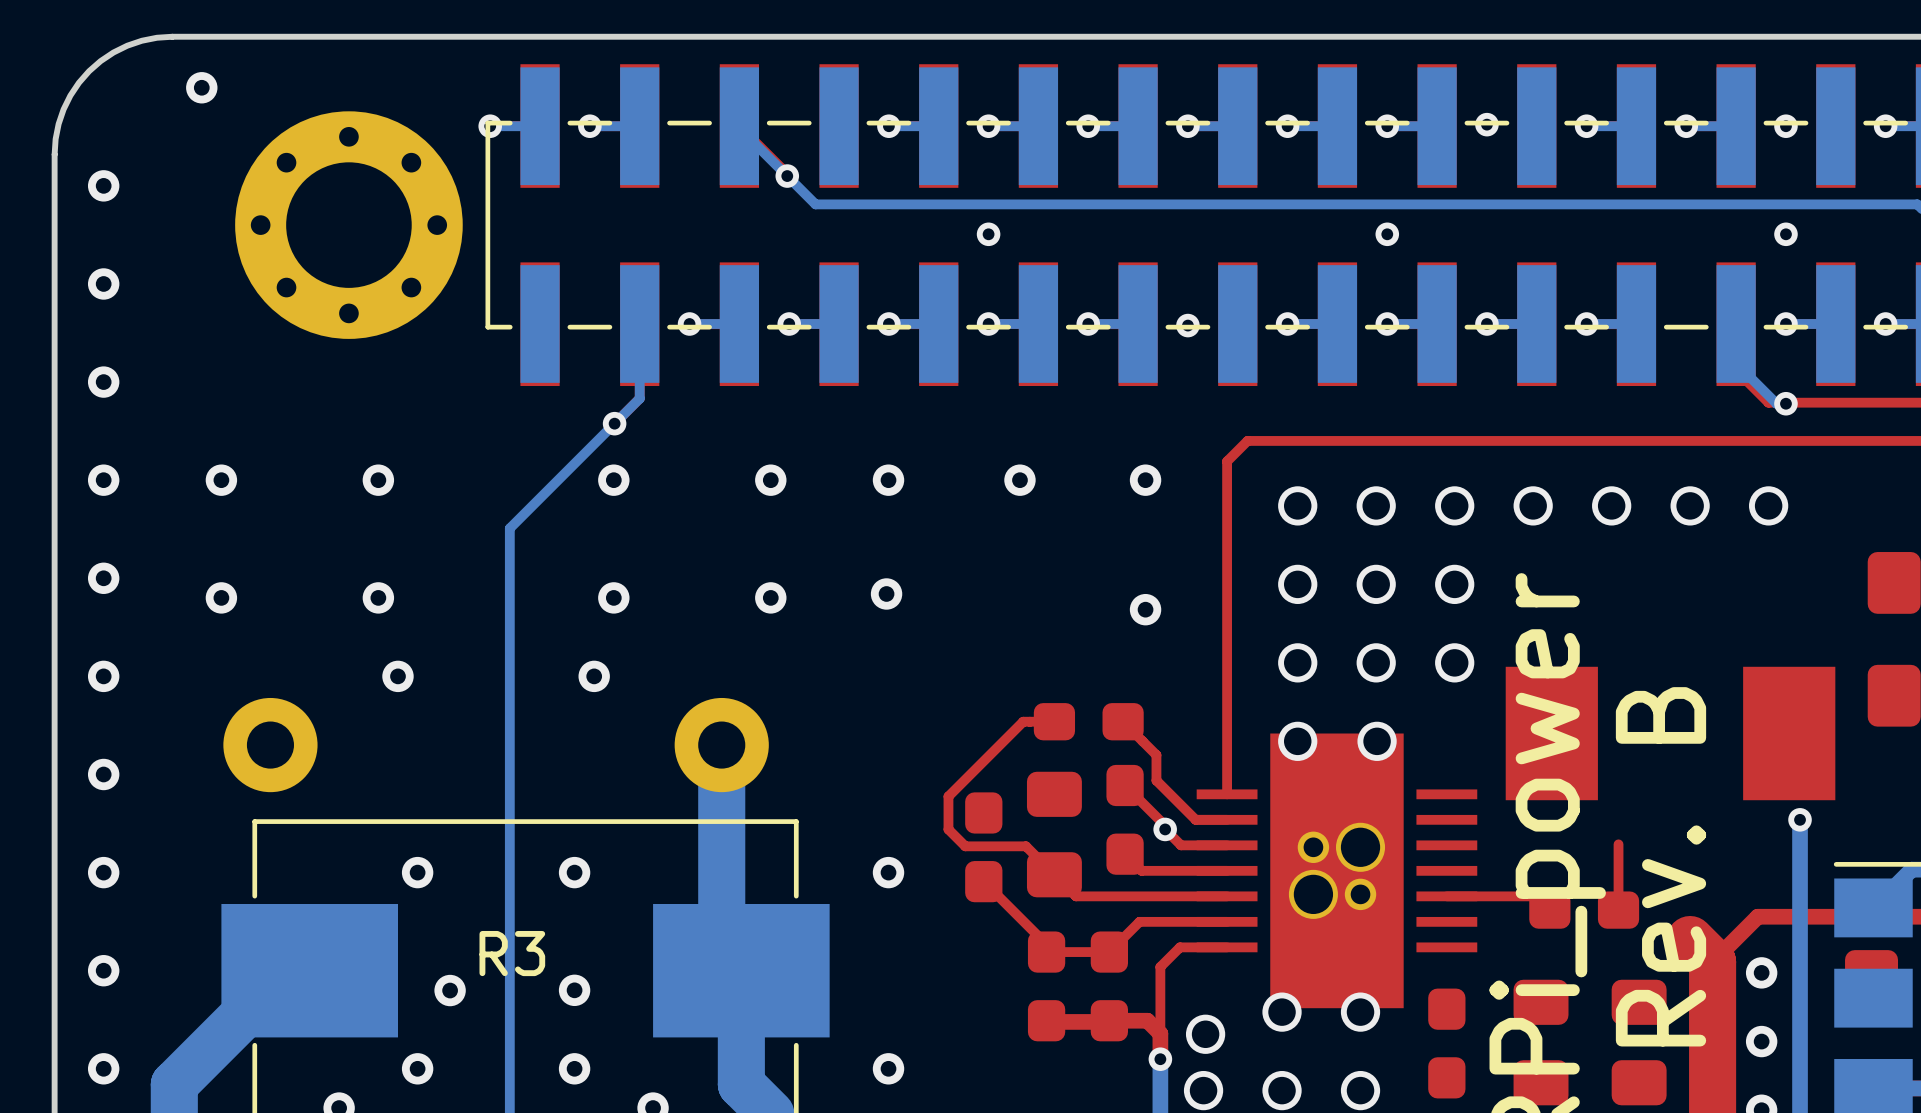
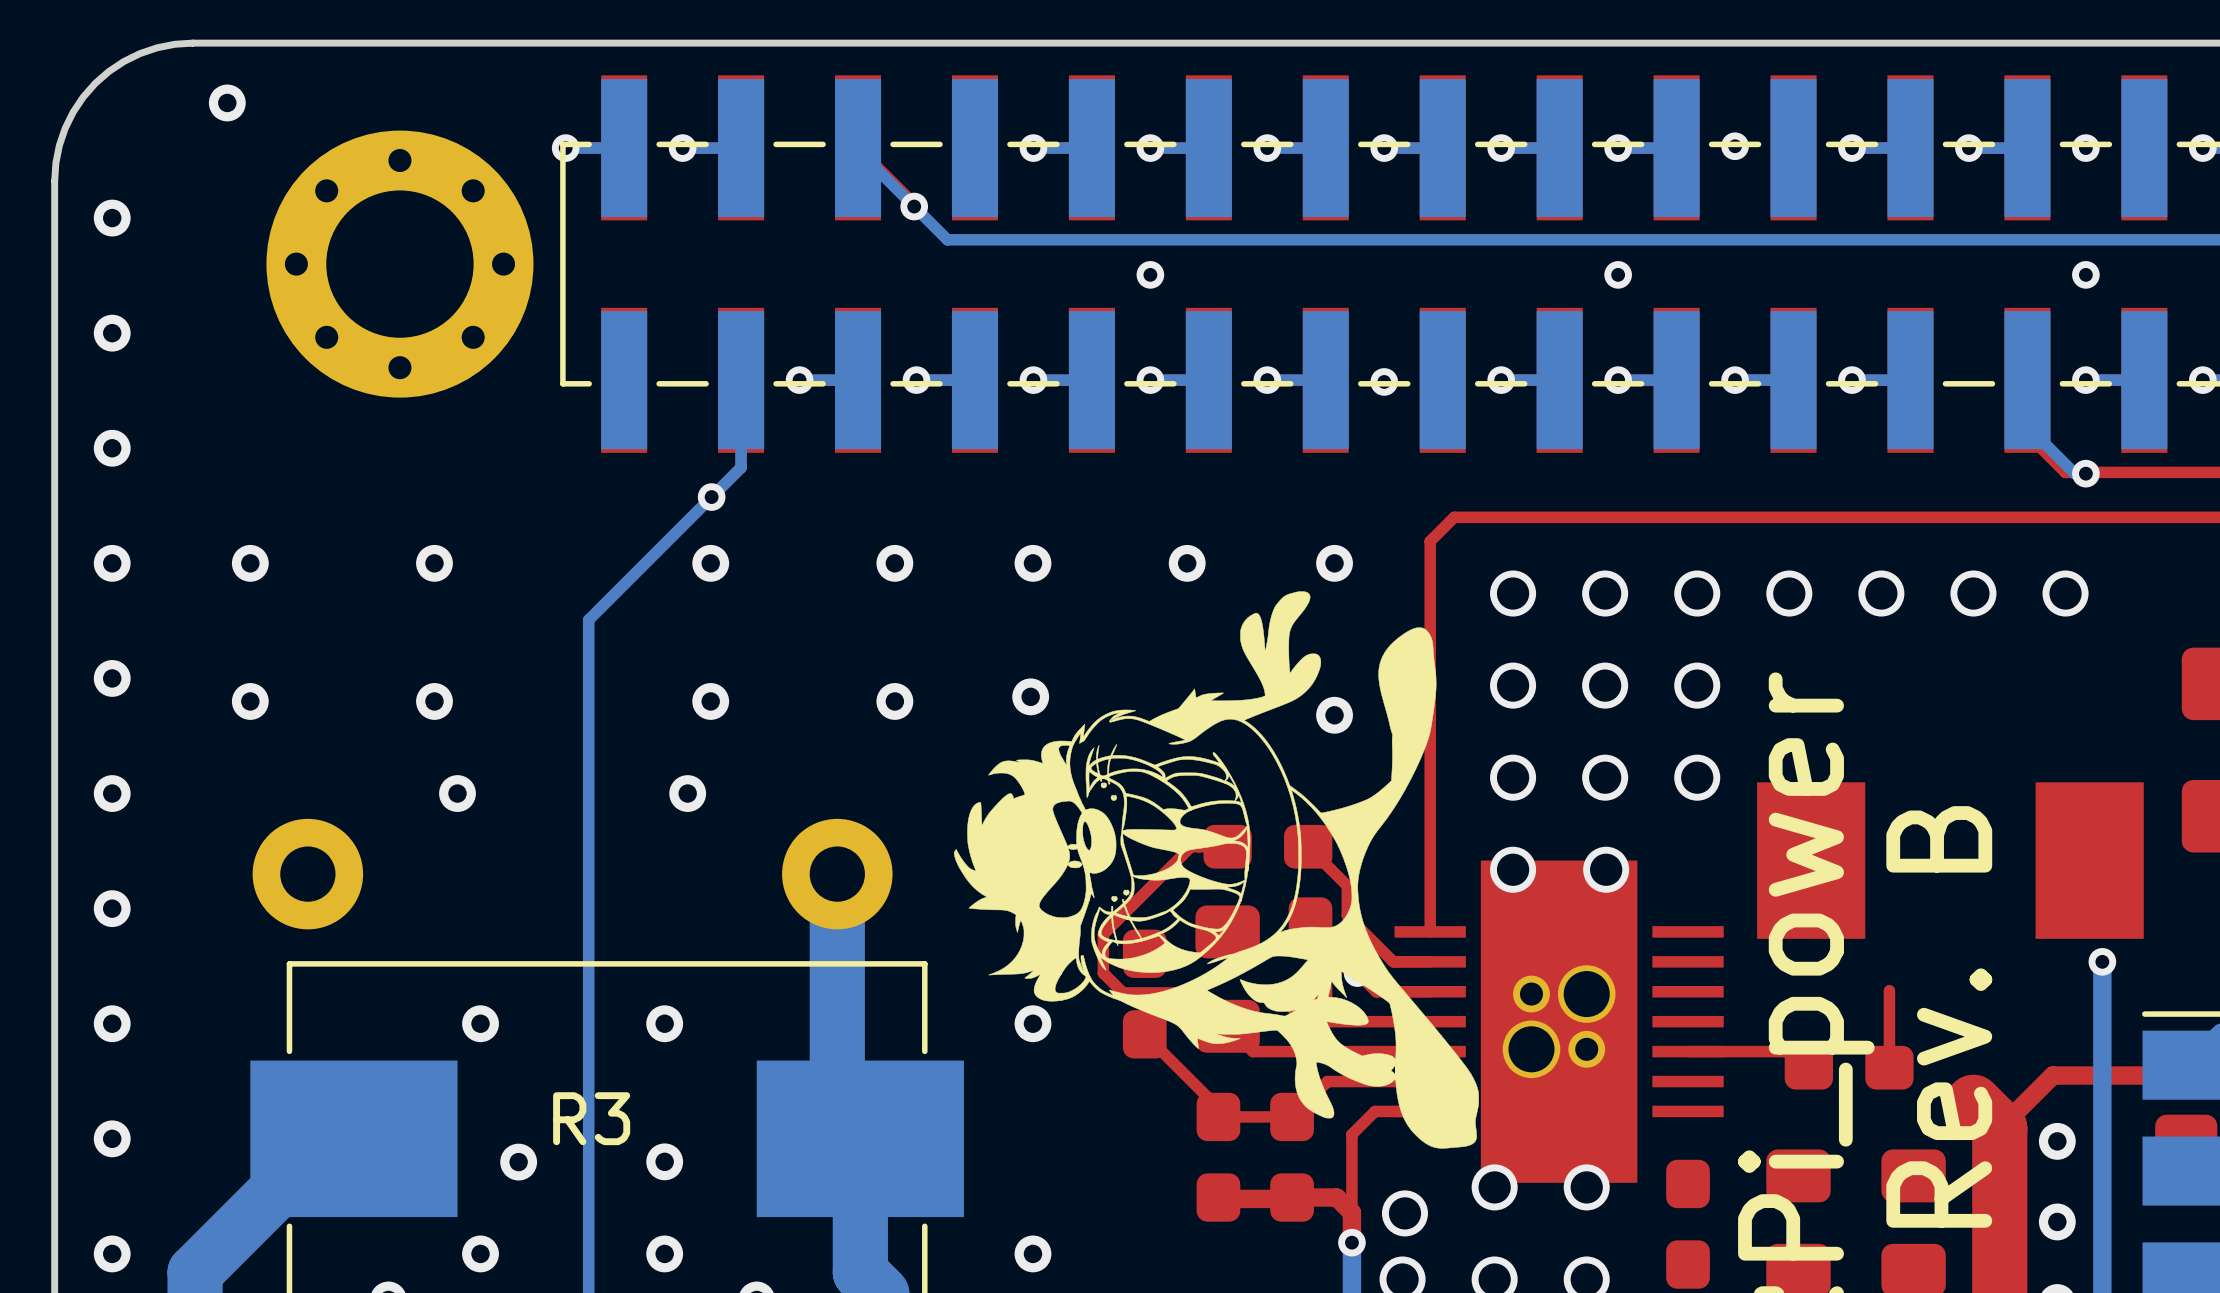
drawing: none -> [954, 591, 1479, 1149]

